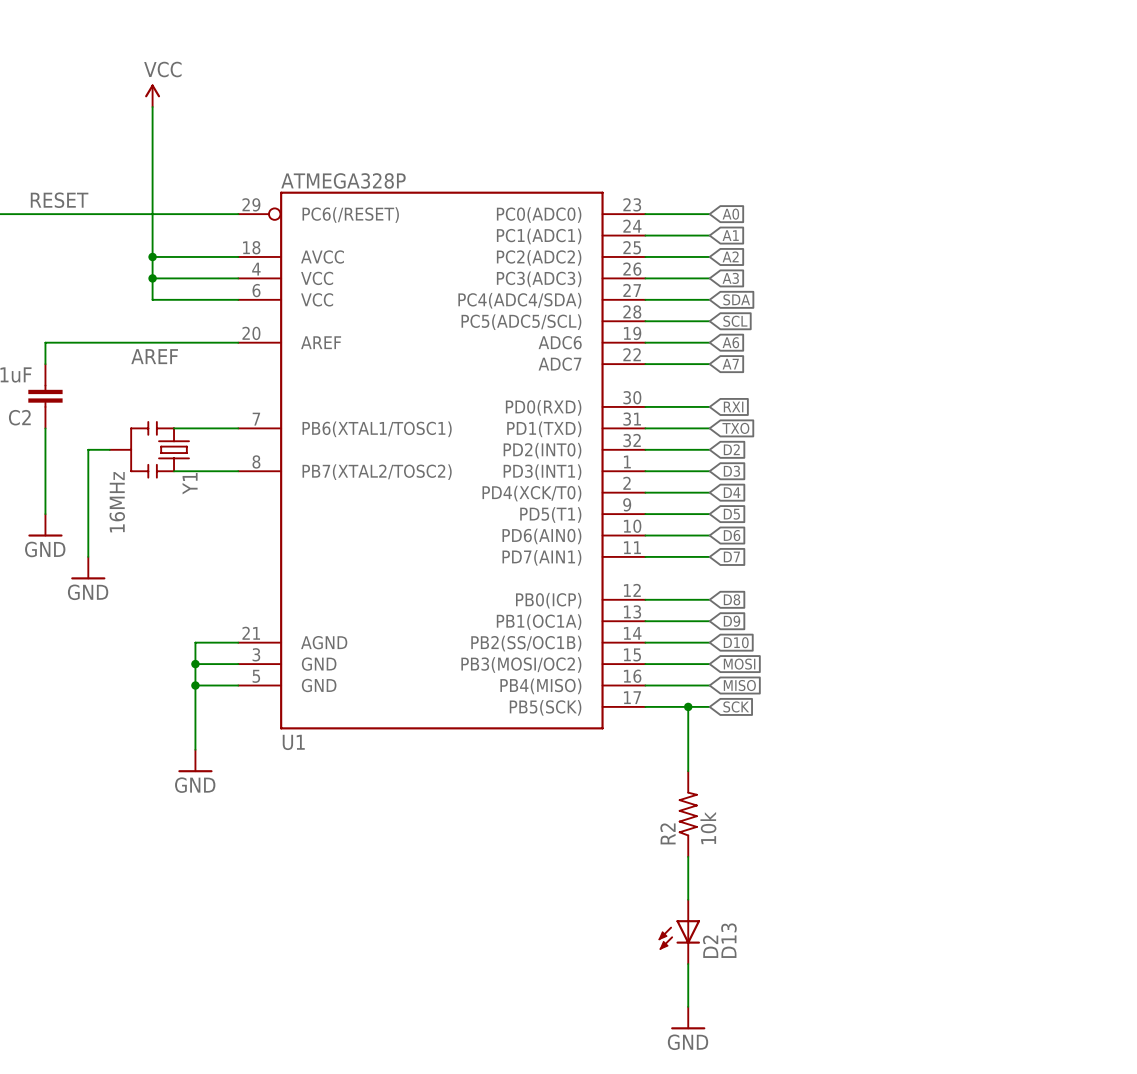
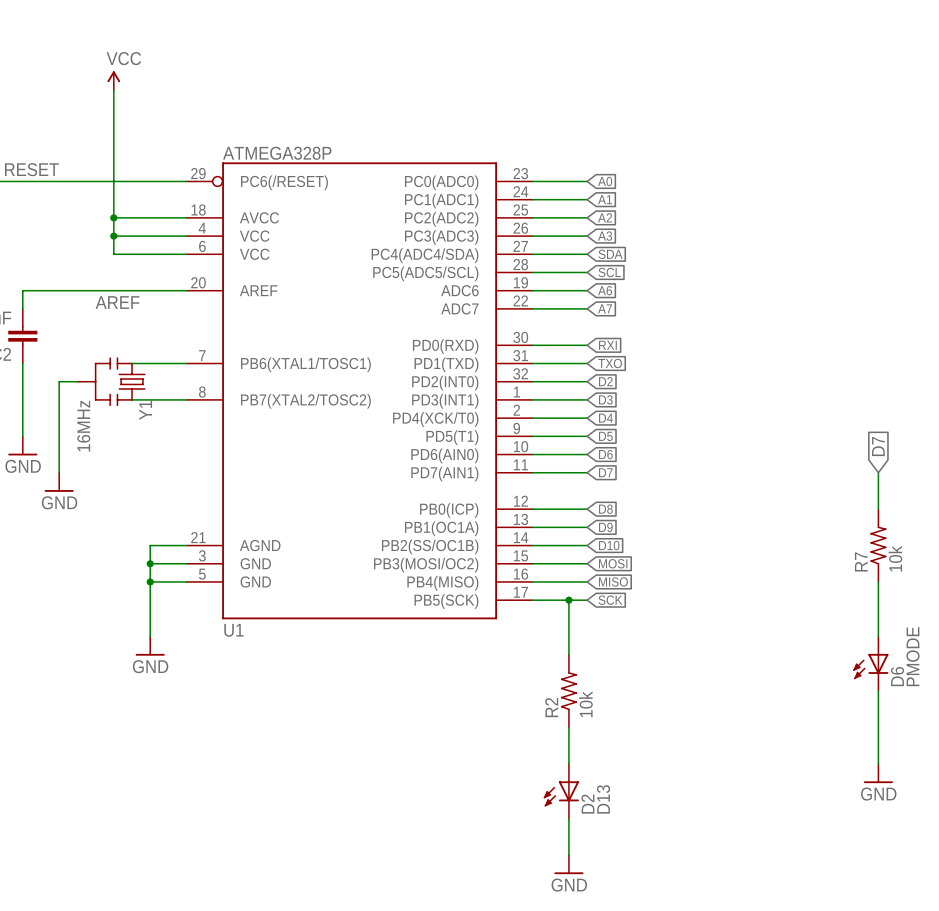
global label: none -> D7 (878, 446)
wire: none -> (878, 472) (878, 509)
R7: none -> 10k (878, 545)
wire: none -> (878, 581) (878, 636)
D6: none -> PMODE (870, 663)
wire: none -> (878, 691) (878, 764)
power symbol: none -> GND (878, 773)

